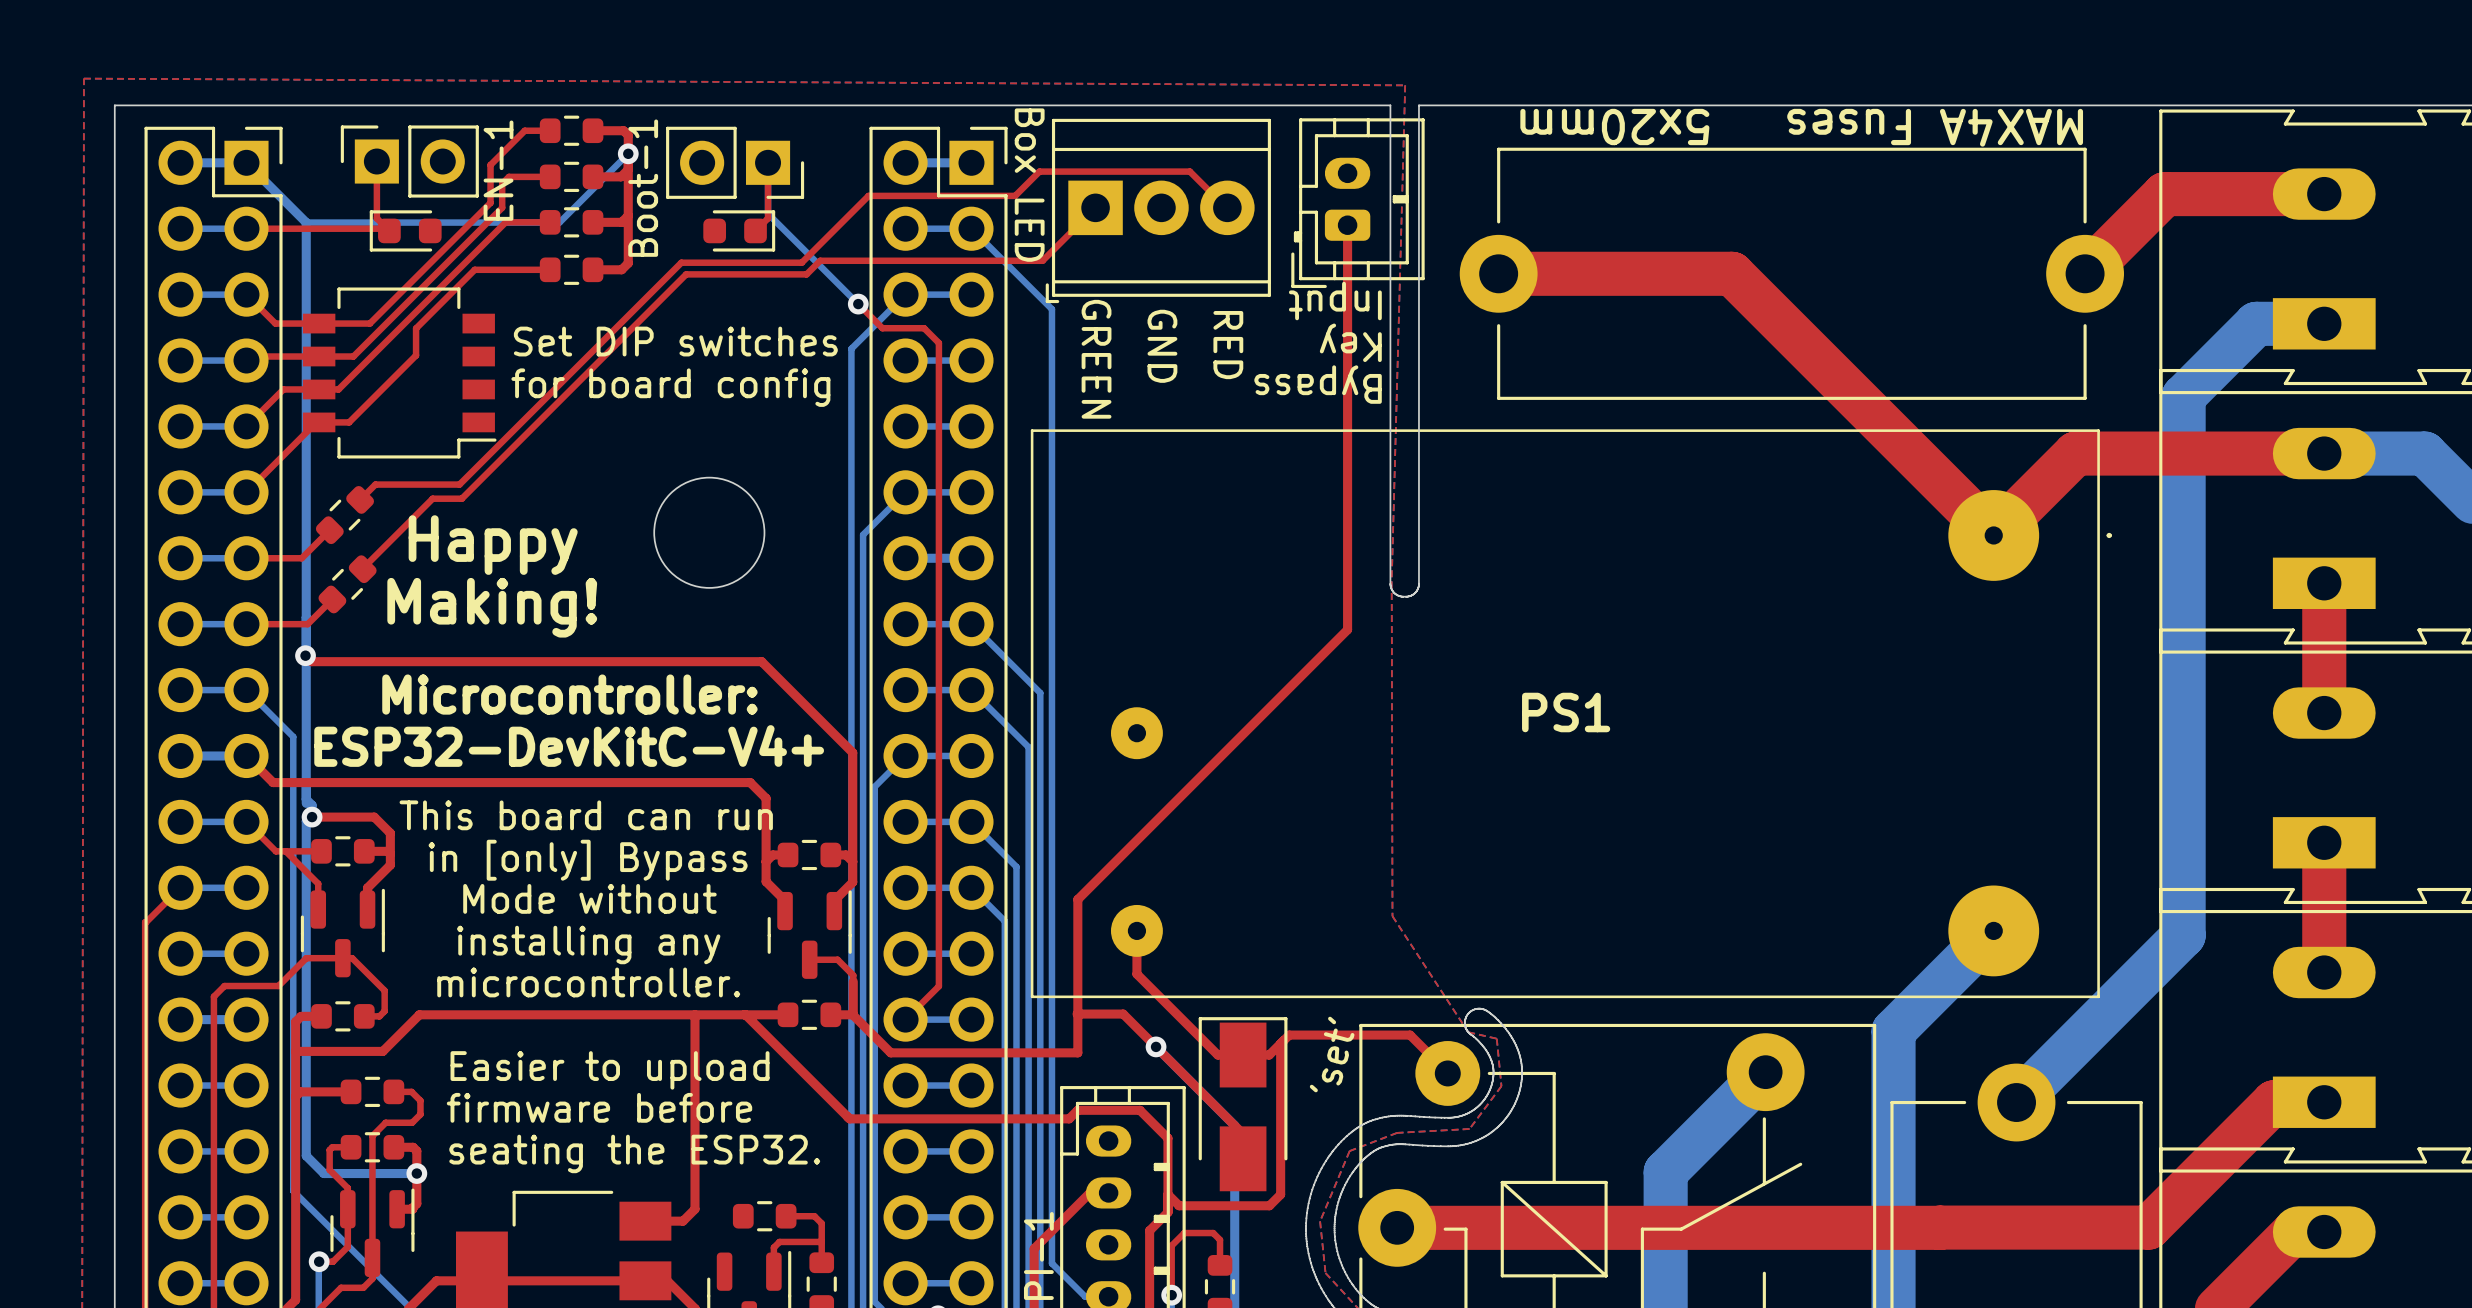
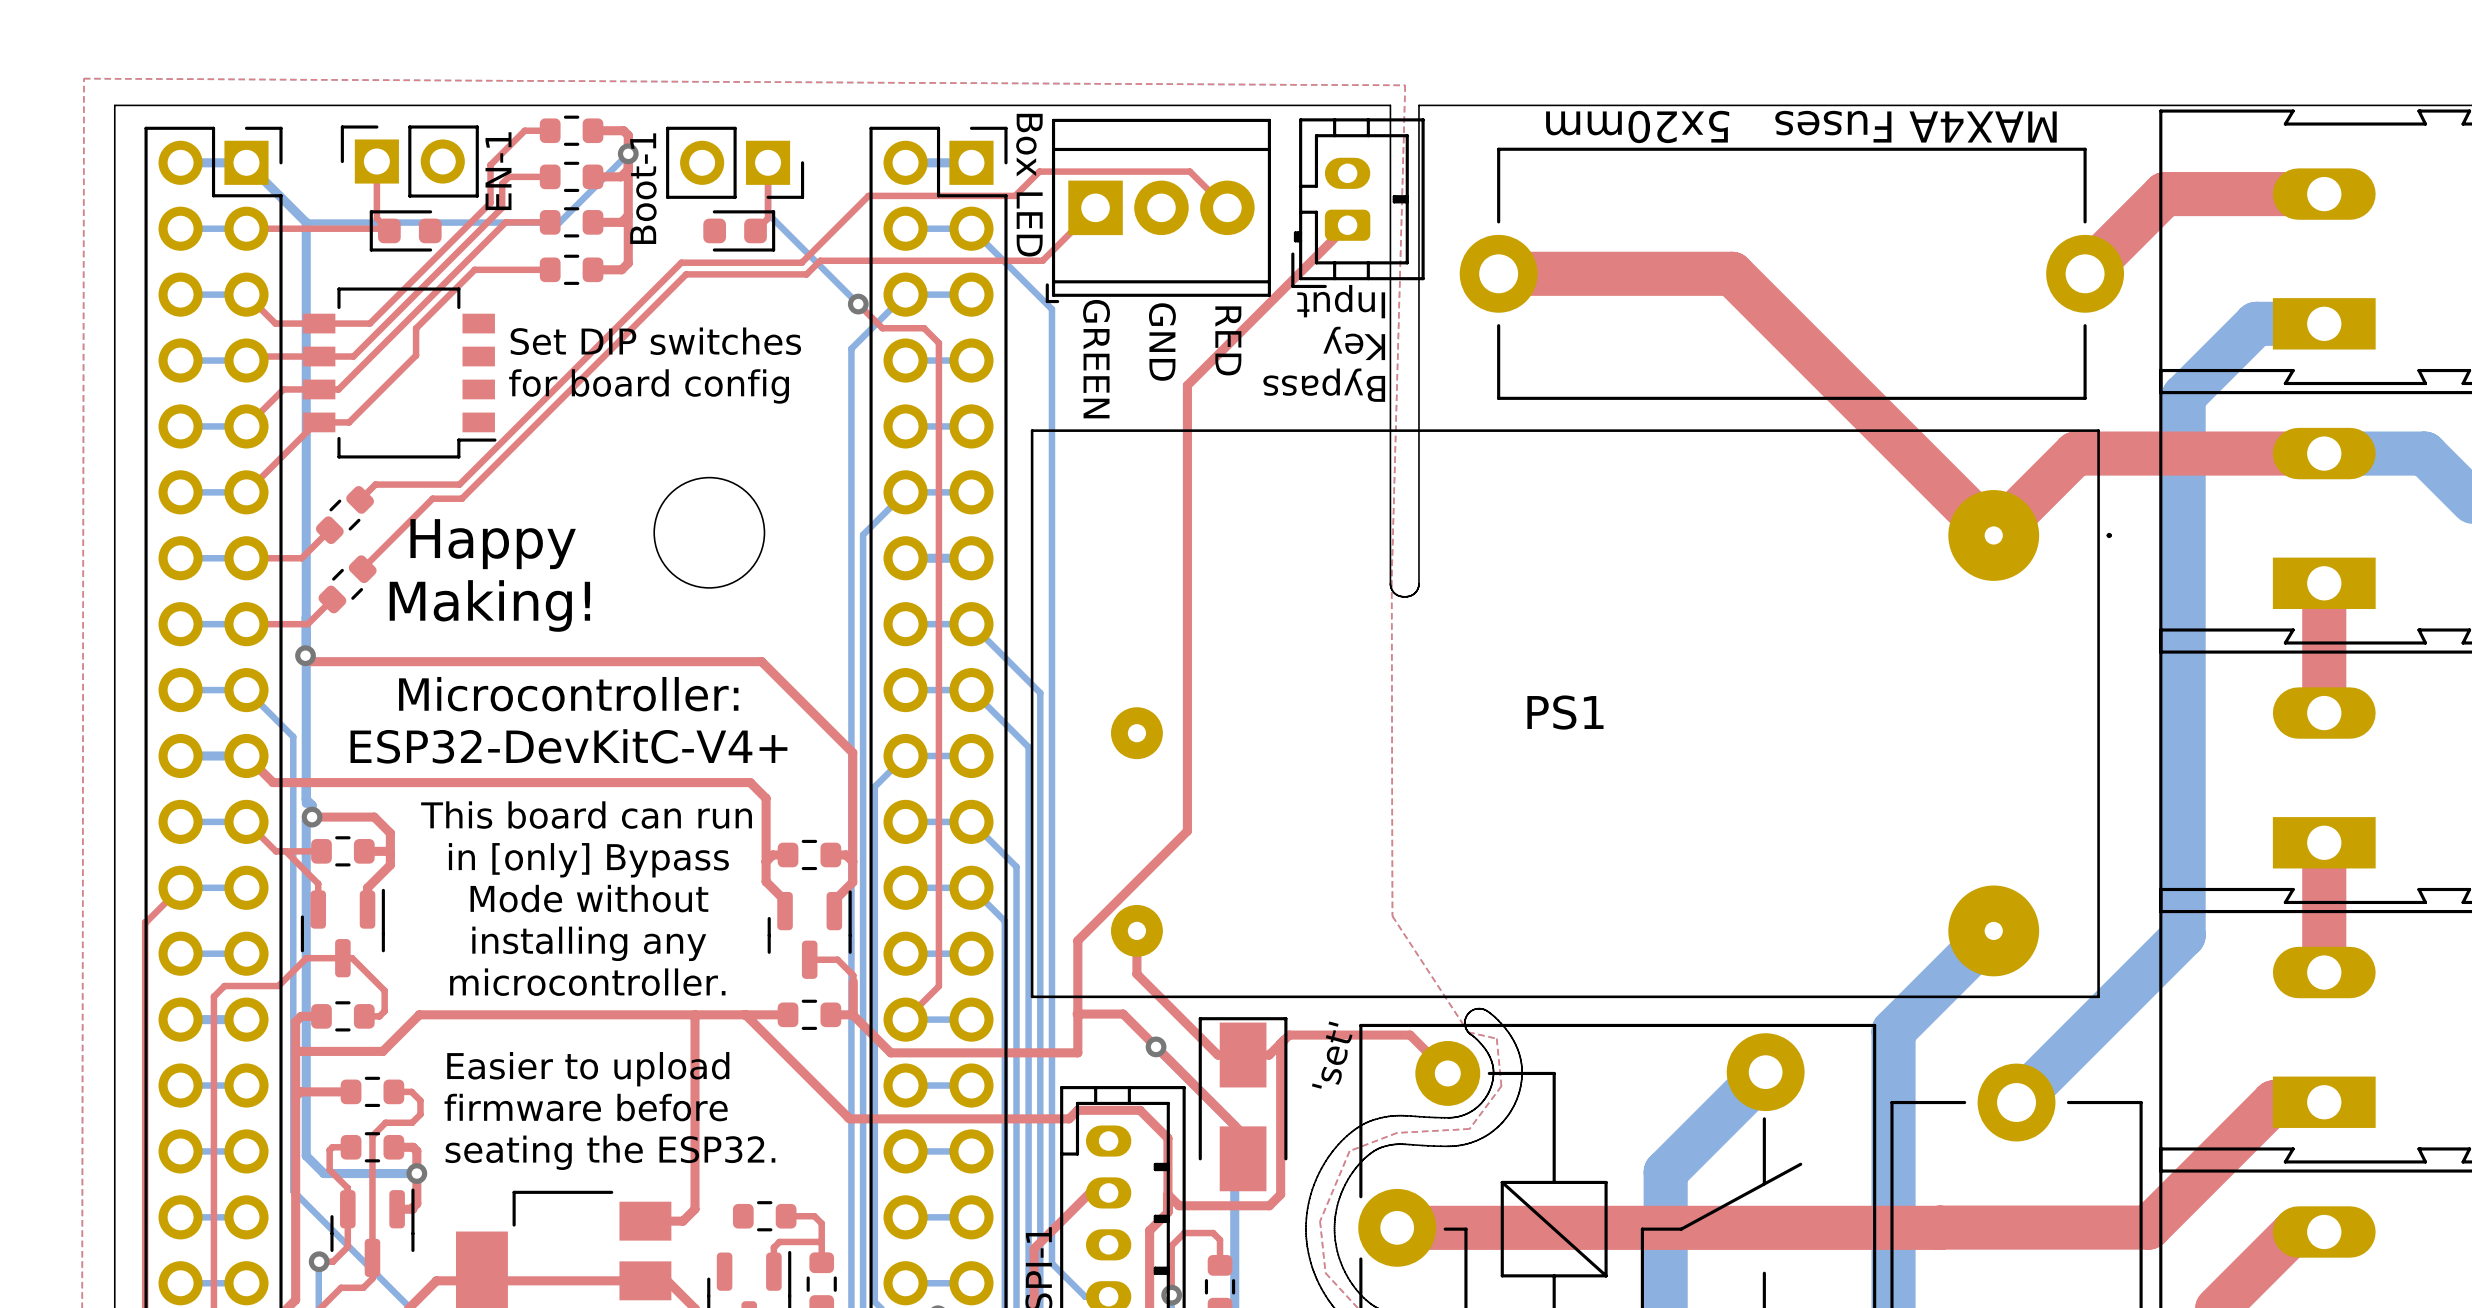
top track: (1347, 225) (1347, 629) (1077, 899) (1077, 940) -> (1347, 225) (1187, 385) (1187, 831) (1077, 940)

